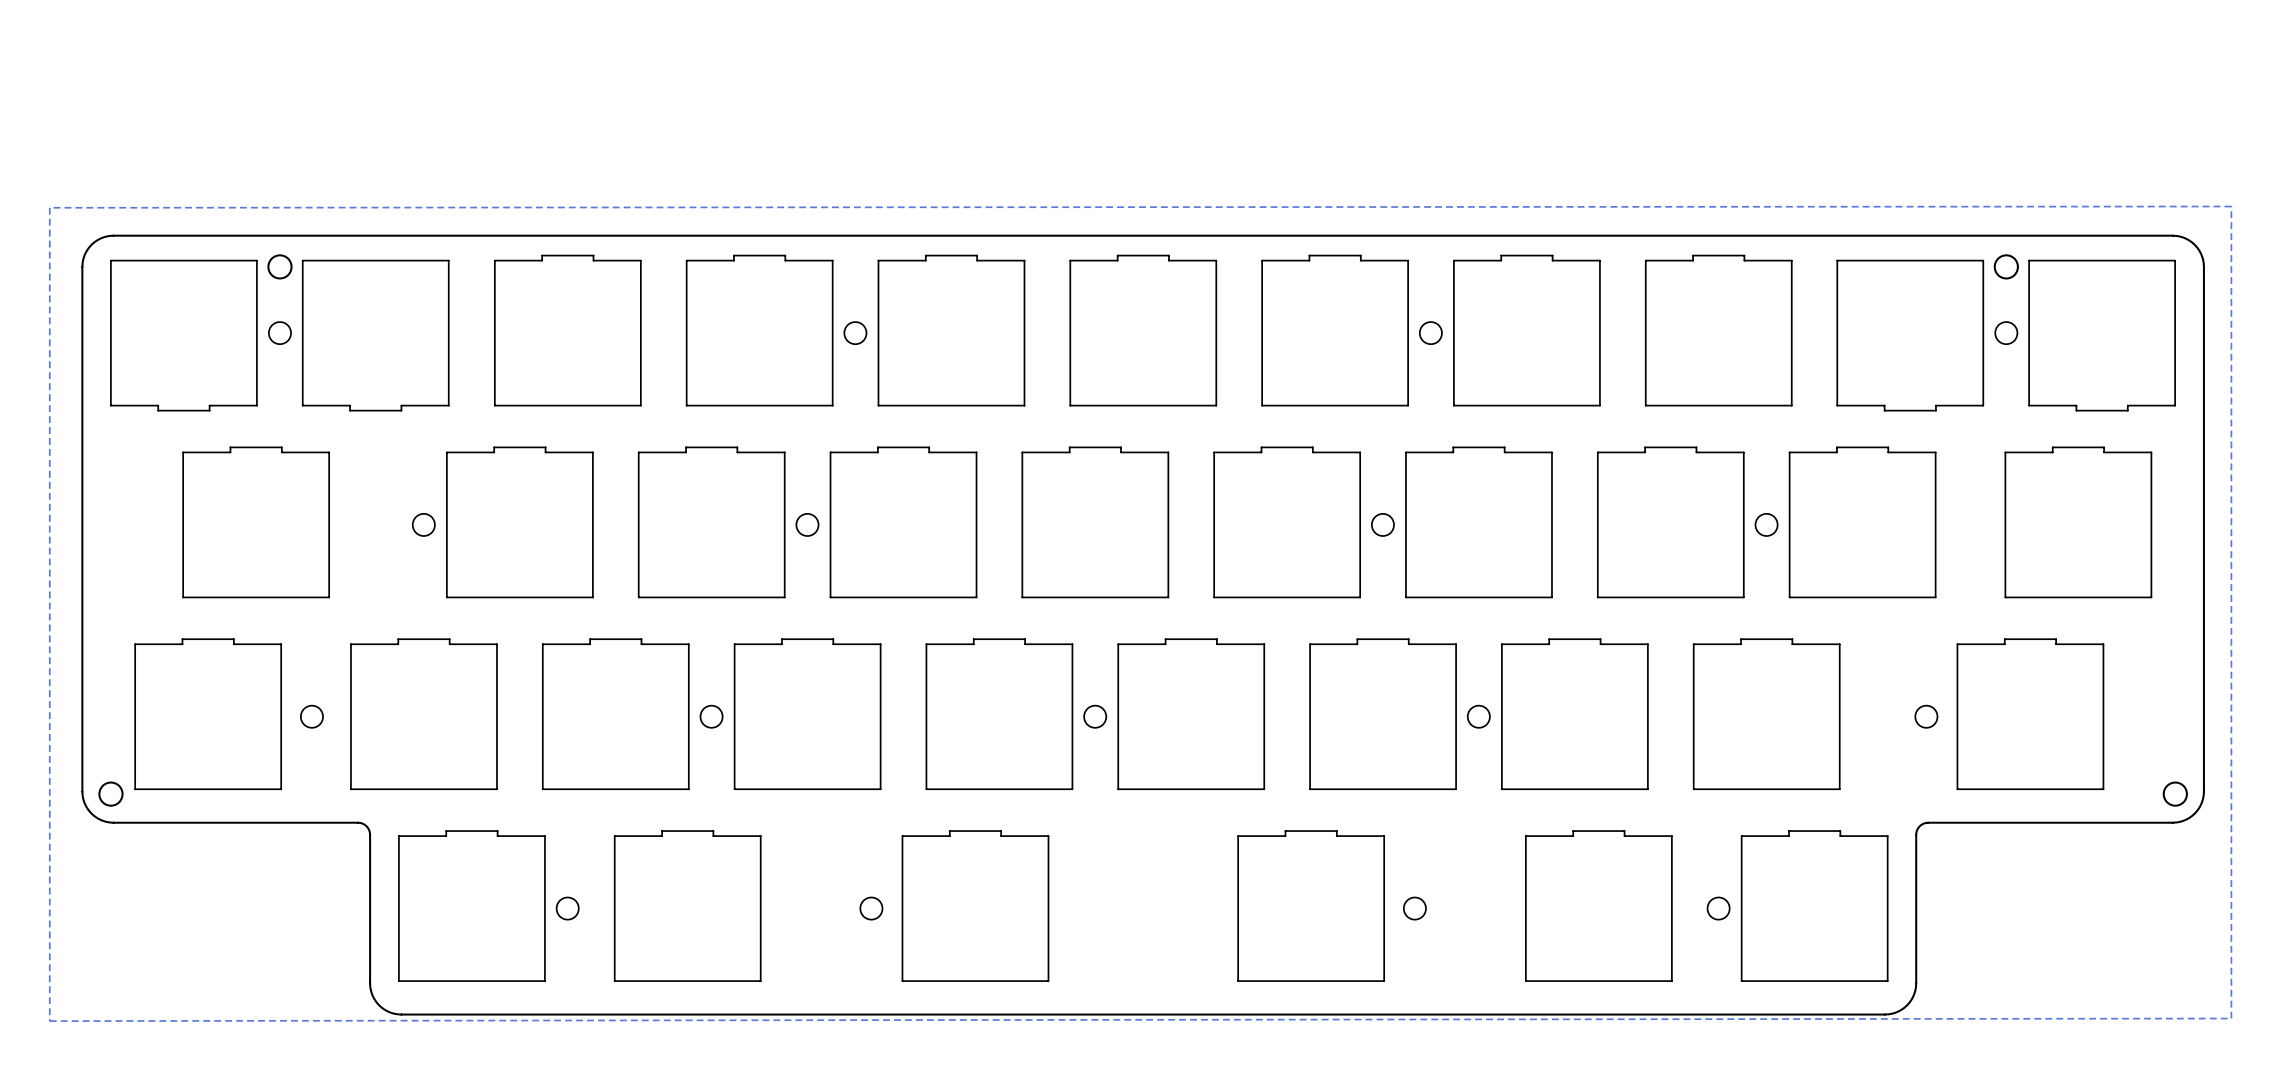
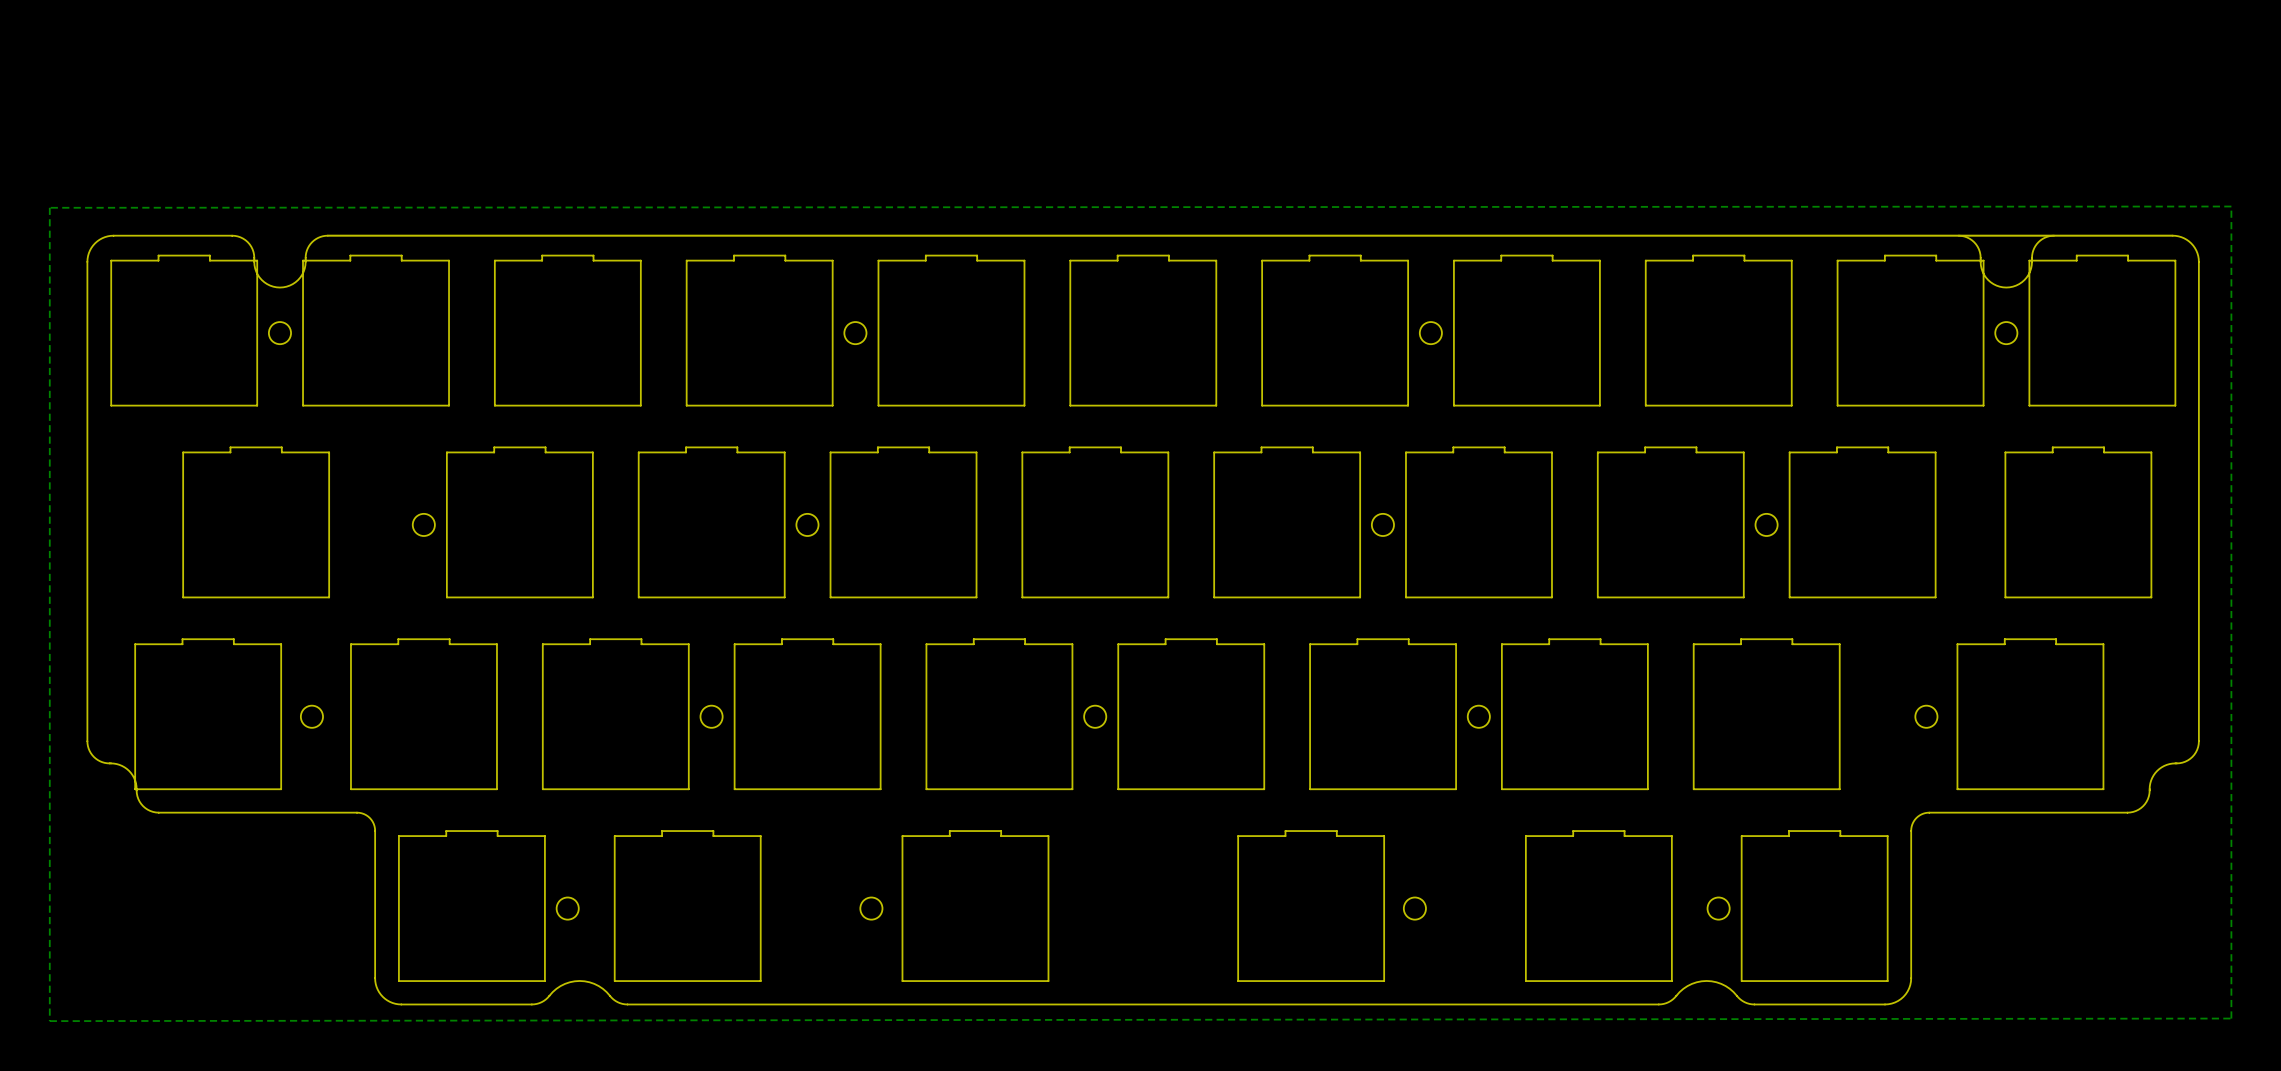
board edge: none -> (1958, 235) (1966, 237) (1976, 244) (1979, 252) (1981, 268) (1988, 280) (1996, 285) (2006, 287) (2016, 285) (2024, 280) (2031, 268) (2032, 252) (2035, 246) (2042, 239) (2054, 235)
board edge: (2172, 235) (2184, 238) (2194, 244) (2201, 254) (2203, 266) (2203, 791) (2201, 803) (2191, 816) (2176, 822) (1928, 822) (1922, 824) (1917, 828) (1916, 834) (1915, 987) (1912, 998) (1904, 1008) (1893, 1013) (1885, 1014) (401, 1014) (385, 1010) (376, 1002) (370, 987) (370, 834) (365, 825) (358, 822) (109, 822) (101, 820) (91, 813) (86, 807) (82, 795) (82, 266) (84, 254) (94, 242) (109, 235) (327, 235) -> (2172, 235) (2181, 237) (2191, 243) (2196, 250) (2198, 261) (2198, 741) (2197, 749) (2187, 760) (2166, 764) (2157, 770) (2151, 780) (2146, 801) (2140, 808) (2133, 811) (1929, 812) (1918, 816) (1912, 822) (1911, 830) (1910, 981) (1907, 991) (1900, 999) (1885, 1004) (1751, 1004) (1742, 1000) (1725, 986) (1706, 980) (1687, 986) (1670, 1000) (1658, 1004) (627, 1004) (615, 1000) (598, 986) (579, 980) (560, 986) (543, 1000) (534, 1004) (401, 1004) (389, 1001) (380, 994) (375, 981) (375, 830) (373, 823) (368, 816) (357, 812) (153, 811) (145, 808) (139, 801) (135, 780) (129, 770) (119, 764) (97, 760) (90, 753) (87, 743) (87, 261) (89, 250) (97, 241) (110, 235) (235, 235) (245, 240) (251, 246) (255, 268) (259, 277) (270, 285) (279, 287) (289, 285) (298, 280) (304, 268) (306, 252) (309, 246) (318, 237) (327, 235)
round board edge: [267, 254, 293, 280] -> none
round board edge: [1993, 254, 2019, 280] -> none
drawing shape: [110, 260, 258, 412] -> [110, 255, 258, 407]
drawing shape: [302, 260, 450, 412] -> [302, 255, 450, 407]
drawing shape: [1836, 260, 1984, 412] -> [1837, 255, 1985, 407]
drawing shape: [2028, 260, 2176, 412] -> [2028, 255, 2176, 407]
round board edge: [98, 781, 124, 807] -> none
round board edge: [2162, 781, 2188, 807] -> none

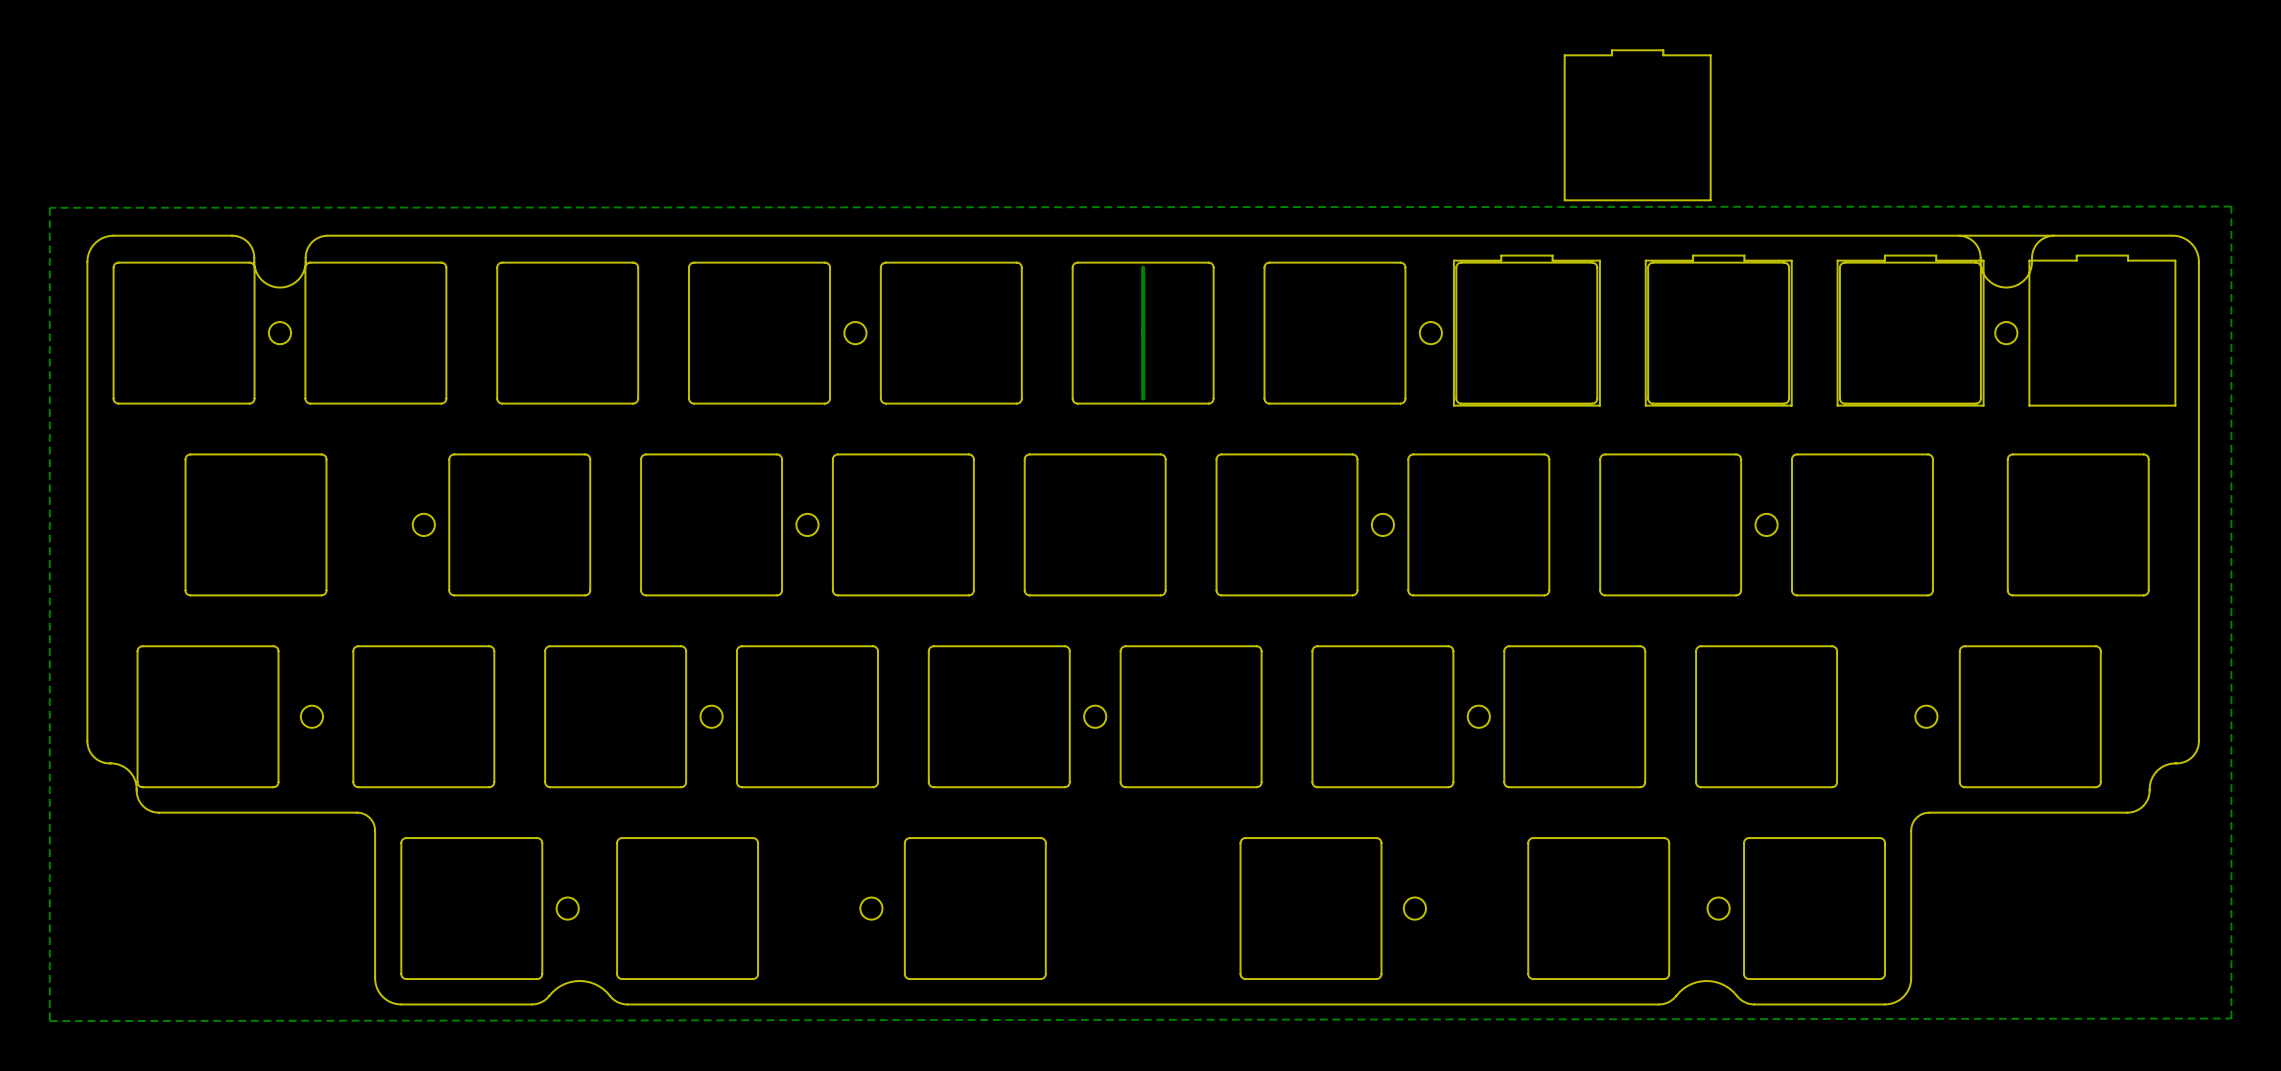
drawing: none -> [1564, 49, 1712, 201]
drawing shape: [110, 255, 258, 407] -> [113, 262, 256, 405]
drawing shape: [302, 255, 450, 407] -> [304, 262, 447, 405]
drawing shape: [494, 255, 642, 407] -> [496, 262, 639, 405]
drawing shape: [686, 255, 834, 407] -> [688, 262, 831, 405]
drawing shape: [877, 255, 1025, 407] -> [880, 262, 1023, 405]
drawing shape: [1069, 255, 1217, 407] -> [1072, 262, 1215, 405]
drawing shape: [1261, 255, 1409, 407] -> [1263, 262, 1406, 405]
drawing: none -> [1455, 262, 1598, 405]
drawing: none -> [1647, 262, 1790, 405]
drawing: none -> [1839, 262, 1982, 405]
part: none -> (1143, 333)
drawing shape: [182, 446, 330, 598] -> [185, 453, 327, 596]
drawing shape: [446, 446, 594, 598] -> [448, 453, 591, 596]
drawing shape: [638, 446, 786, 598] -> [640, 453, 783, 596]
drawing shape: [830, 446, 978, 598] -> [832, 453, 975, 596]
drawing shape: [1021, 446, 1169, 598] -> [1024, 453, 1167, 596]
drawing shape: [1213, 446, 1361, 598] -> [1216, 453, 1359, 596]
drawing shape: [1405, 446, 1553, 598] -> [1407, 453, 1550, 596]
drawing shape: [1597, 446, 1745, 598] -> [1599, 453, 1742, 596]
drawing shape: [1789, 446, 1937, 598] -> [1791, 453, 1934, 596]
drawing shape: [2004, 446, 2152, 598] -> [2007, 453, 2150, 596]
drawing shape: [134, 638, 282, 790] -> [137, 645, 280, 788]
drawing shape: [350, 638, 498, 790] -> [352, 645, 495, 788]
drawing shape: [542, 638, 690, 790] -> [544, 645, 687, 788]
drawing shape: [734, 638, 882, 790] -> [736, 645, 879, 788]
drawing shape: [925, 638, 1073, 790] -> [928, 645, 1071, 788]
drawing shape: [1117, 638, 1265, 790] -> [1120, 645, 1263, 788]
drawing shape: [1309, 638, 1457, 790] -> [1311, 645, 1454, 788]
drawing shape: [1501, 638, 1649, 790] -> [1503, 645, 1646, 788]
drawing shape: [1693, 638, 1841, 790] -> [1695, 645, 1838, 788]
drawing shape: [1956, 638, 2104, 790] -> [1959, 645, 2102, 788]
drawing shape: [398, 830, 546, 982] -> [400, 837, 543, 980]
drawing shape: [614, 830, 762, 982] -> [616, 837, 759, 980]
drawing shape: [901, 830, 1049, 982] -> [904, 837, 1047, 980]
drawing shape: [1237, 830, 1385, 982] -> [1240, 837, 1382, 980]
drawing shape: [1525, 830, 1673, 982] -> [1527, 837, 1670, 980]
drawing shape: [1741, 830, 1889, 982] -> [1743, 837, 1886, 980]

